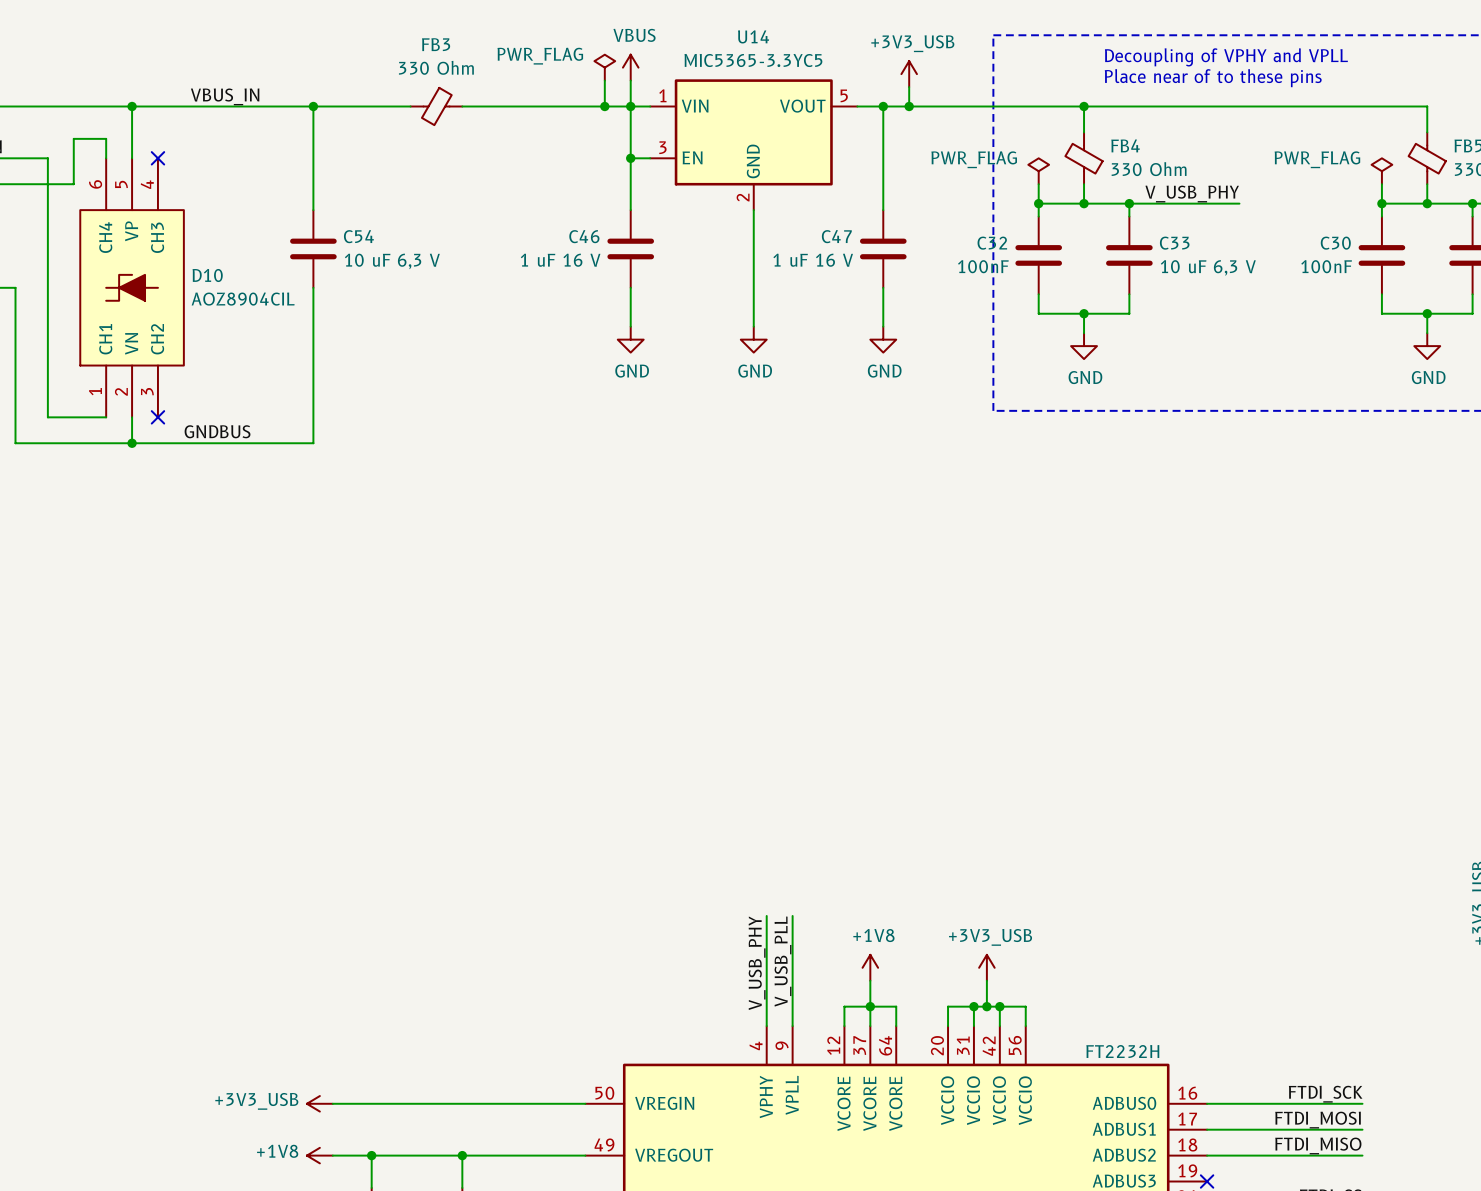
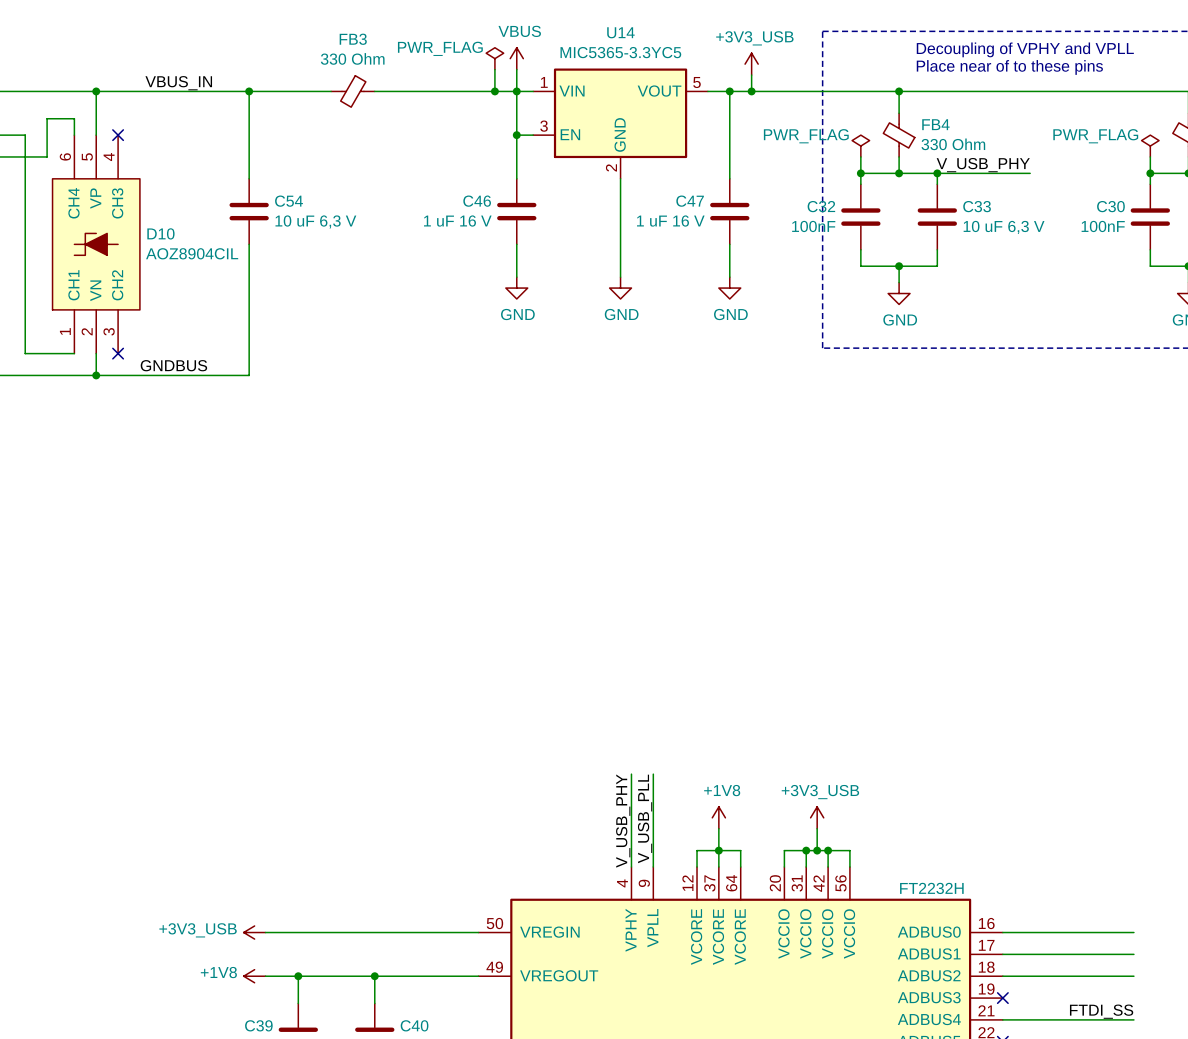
label: FTDI_SCK (1325, 1094) -> none
label: FTDI_MOSI (1318, 1120) -> none
label: FTDI_MISO (1318, 1145) -> none

